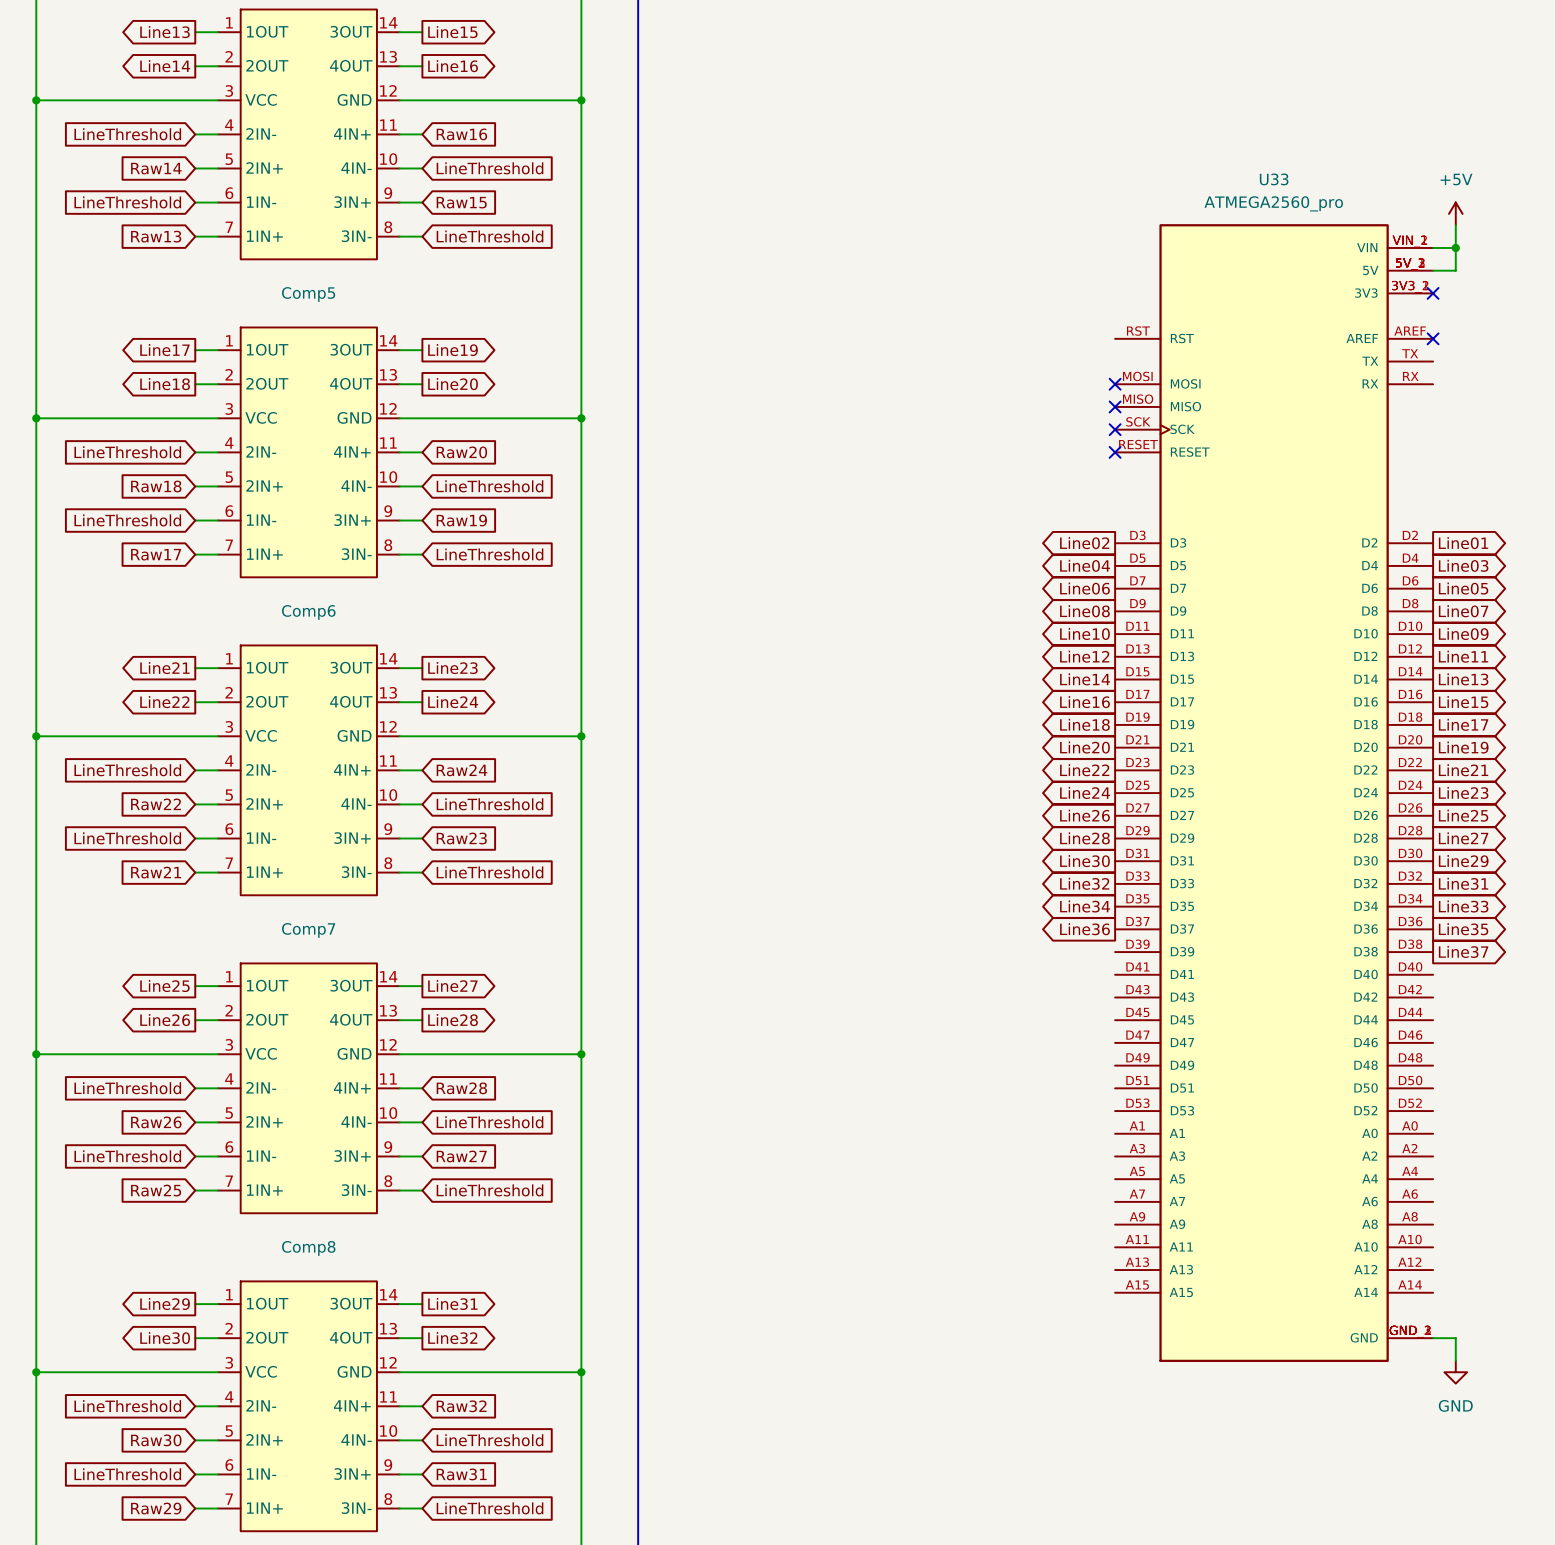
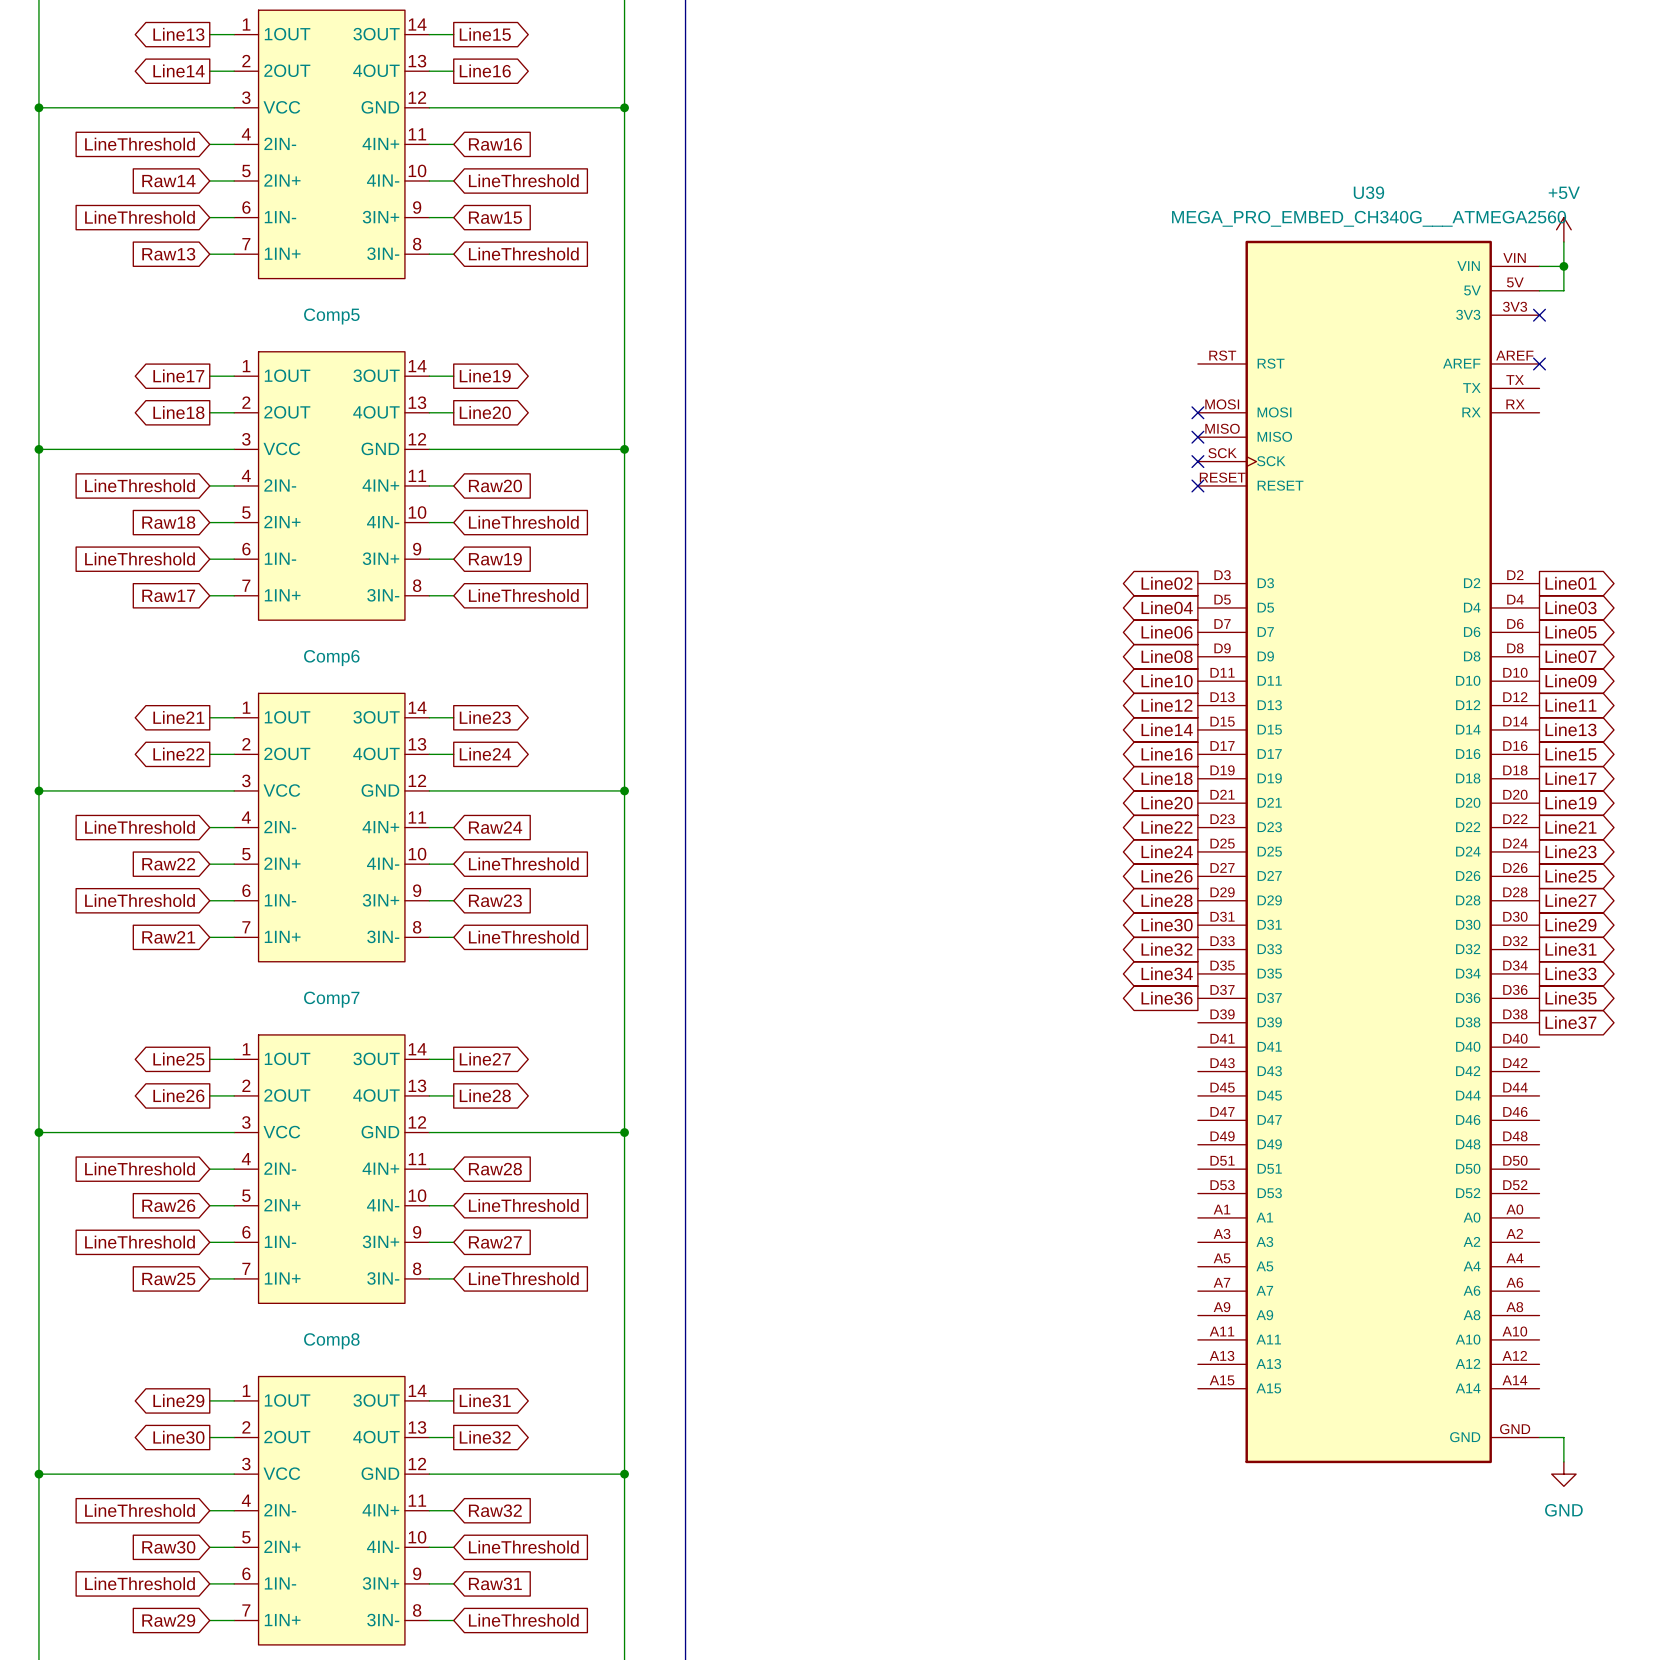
U33 name: U33 (1274, 179) -> U39 (1368, 192)
U33 value: ATMEGA2560_pro (1273, 203) -> MEGA_PRO_EMBED_CH340G___ATMEGA2560 (1369, 218)
U33 symbol: [1115, 224, 1434, 1363] -> [1197, 240, 1540, 1464]

